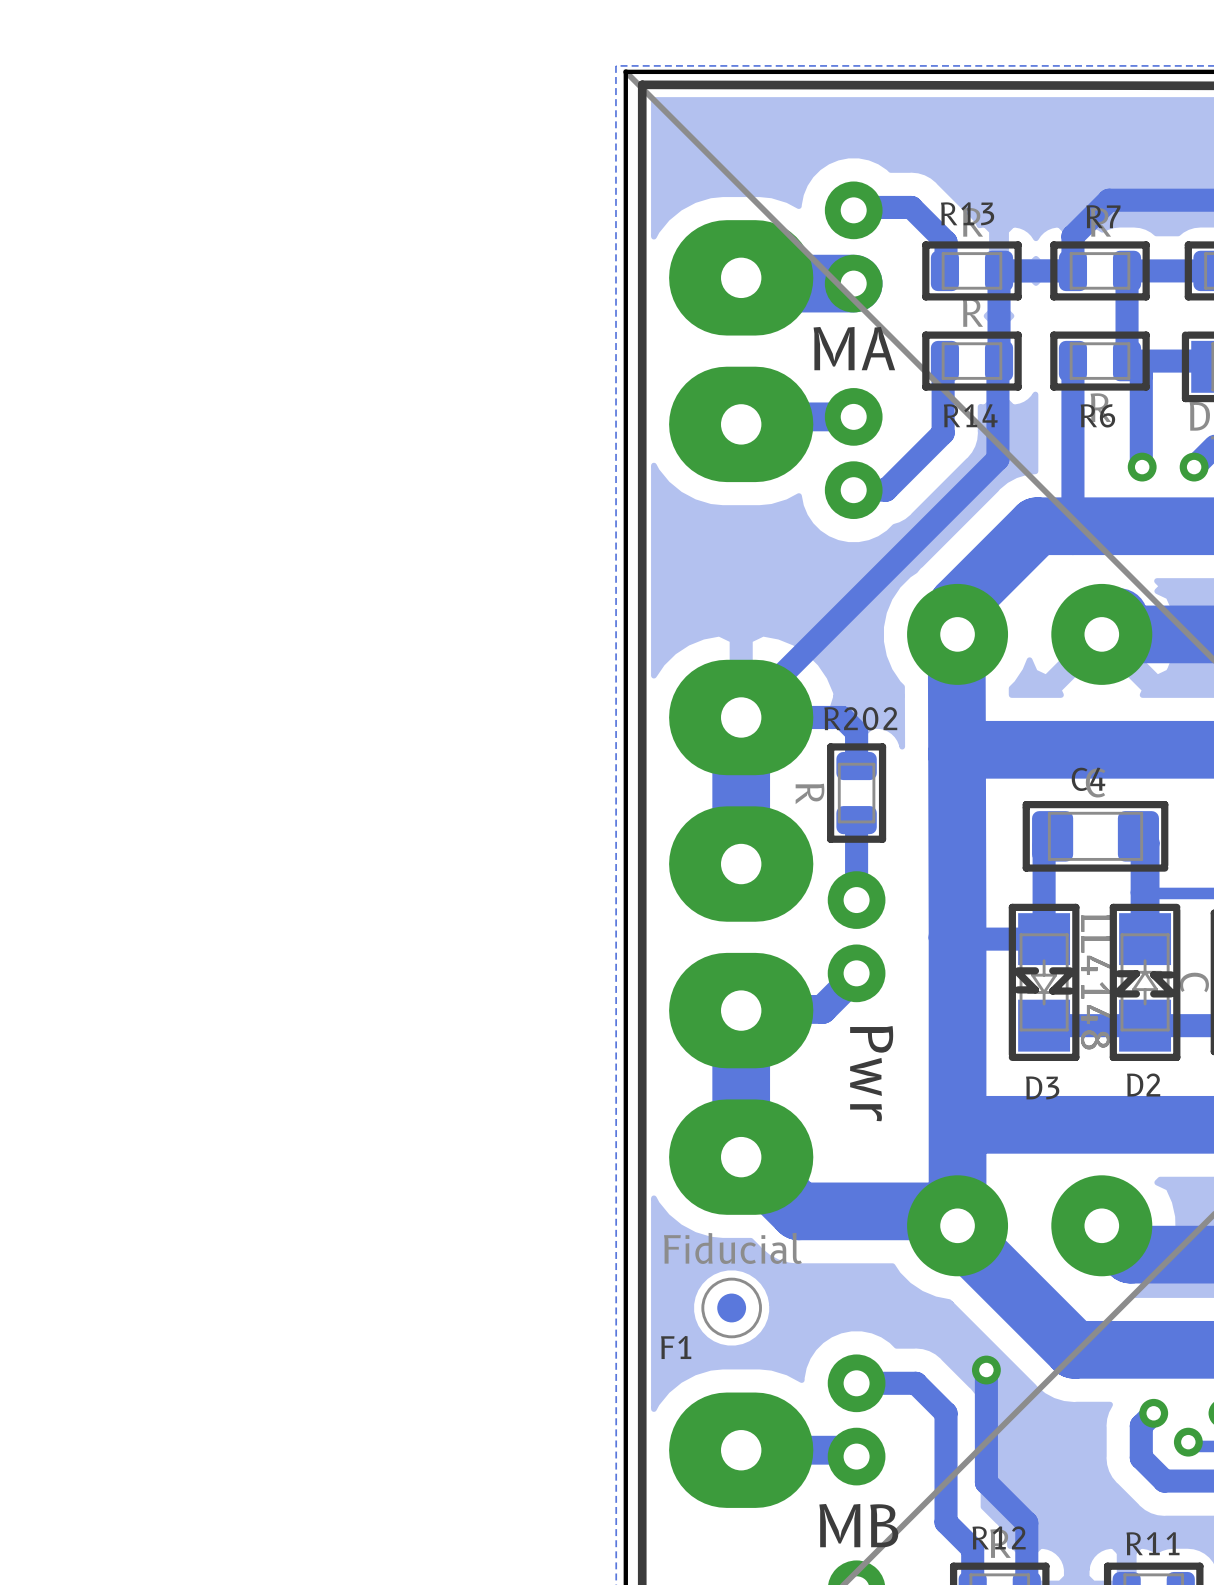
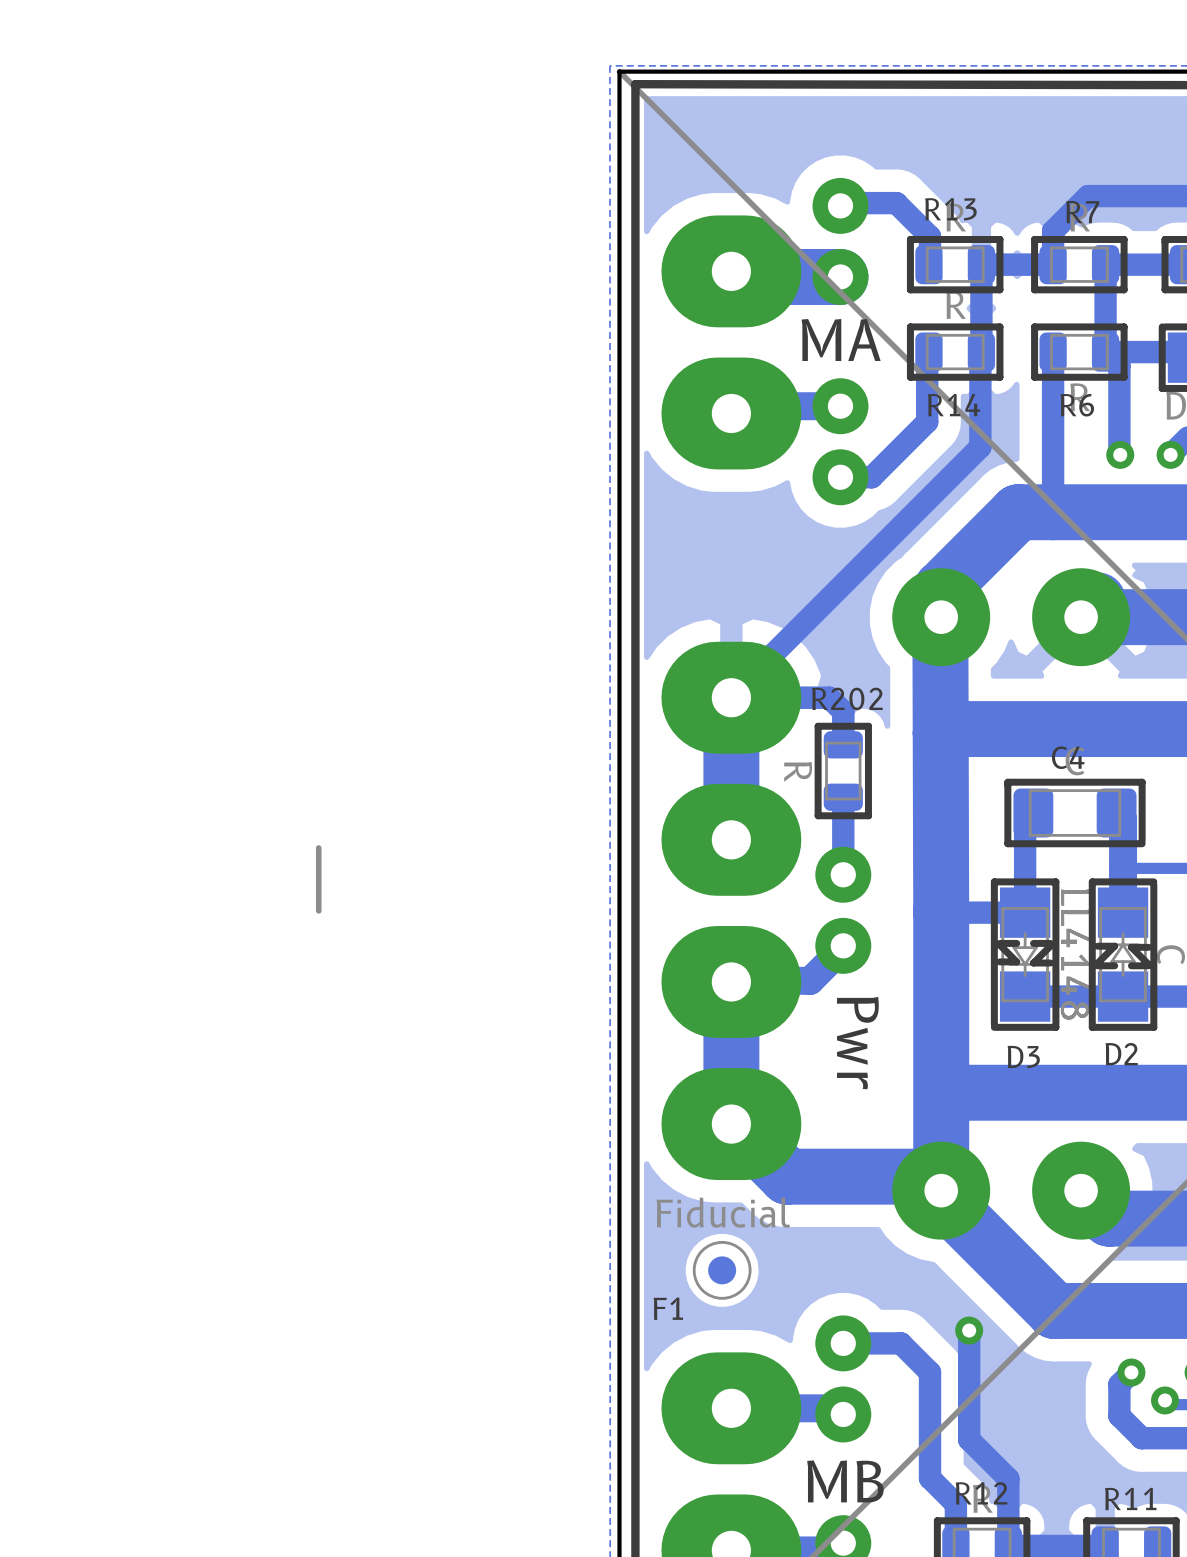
line: none -> (318, 847) (318, 910)

